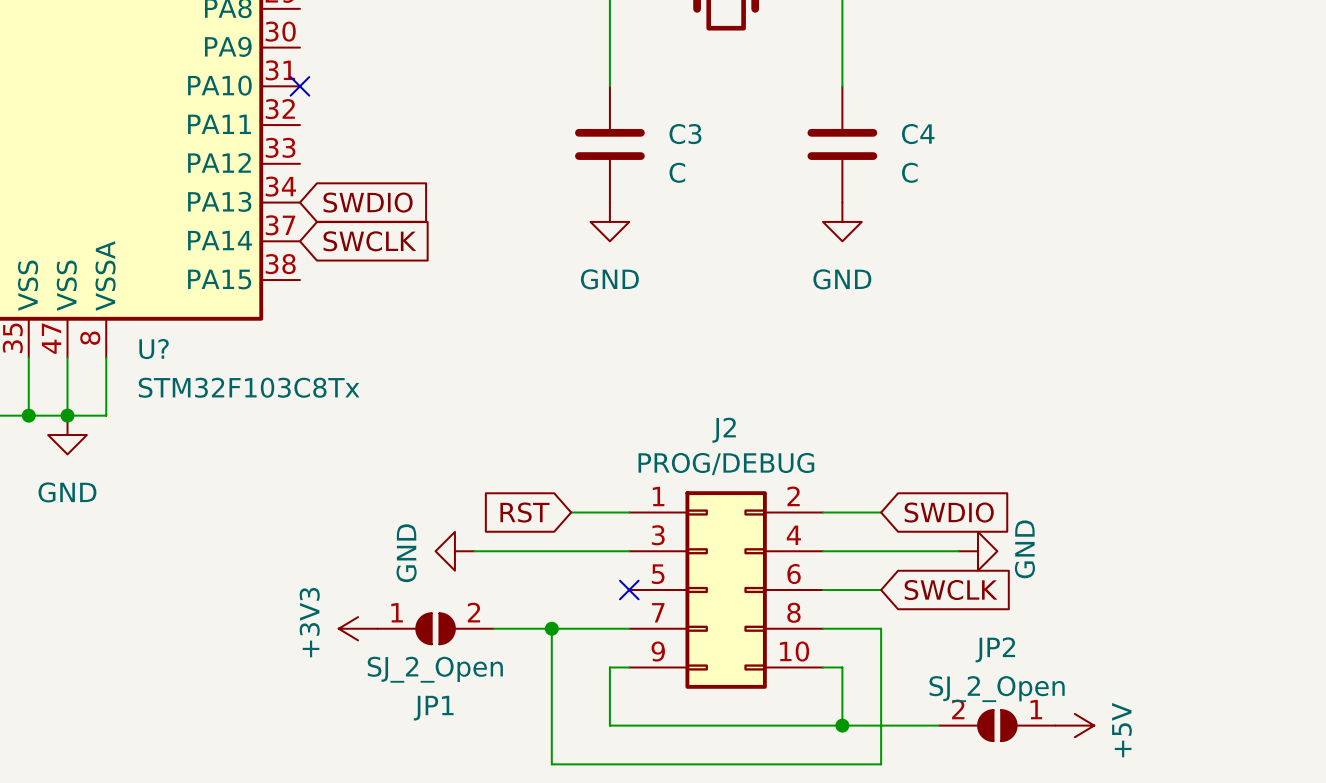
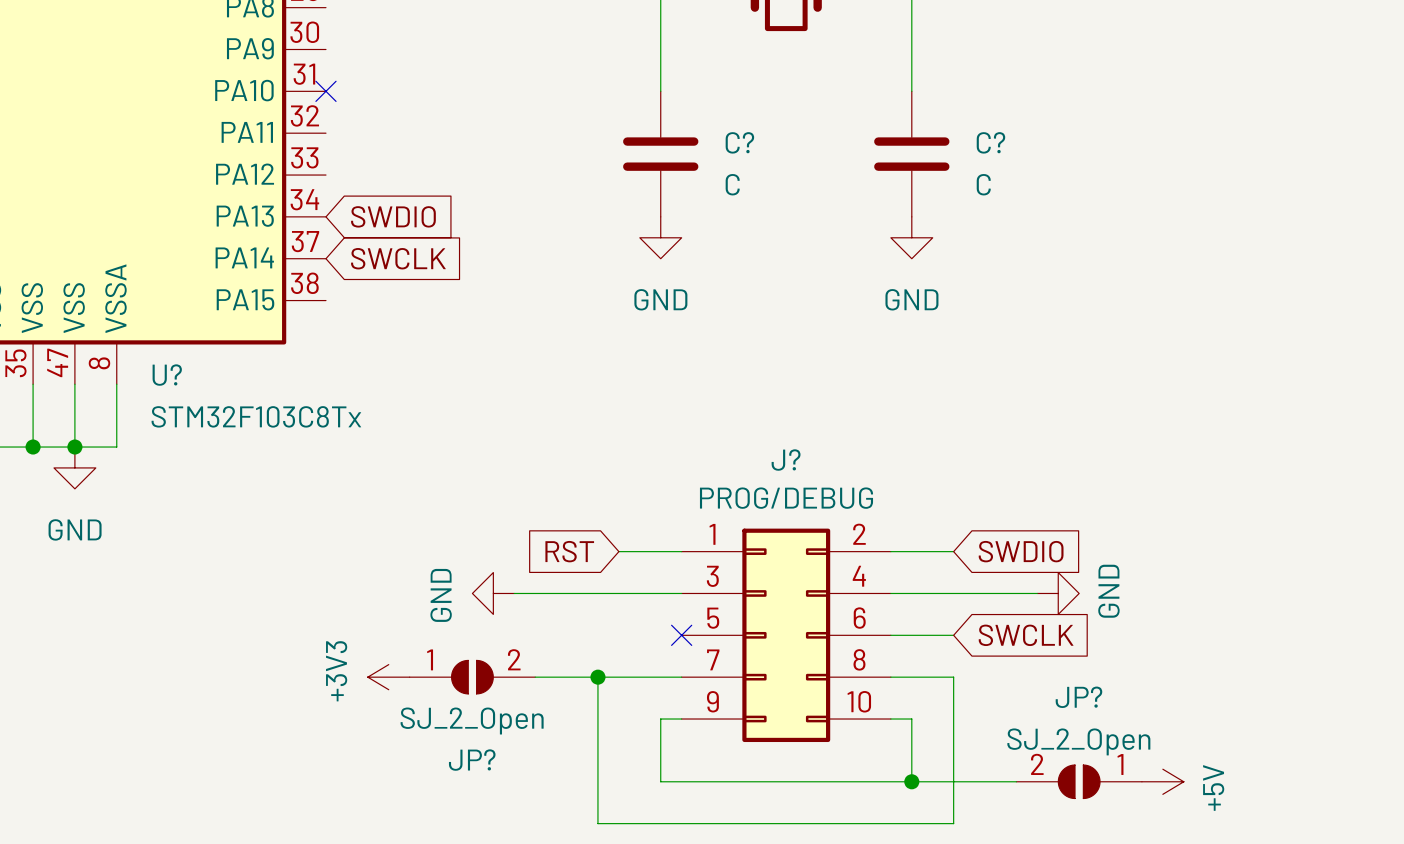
C3 name: C3 (685, 134) -> C? (739, 142)
C4 name: C4 (918, 134) -> C? (990, 142)
J2 name: J2 (724, 430) -> J? (786, 460)
JP2 name: JP2 (995, 649) -> JP? (1078, 697)
JP1 name: JP1 (433, 708) -> JP? (472, 760)

